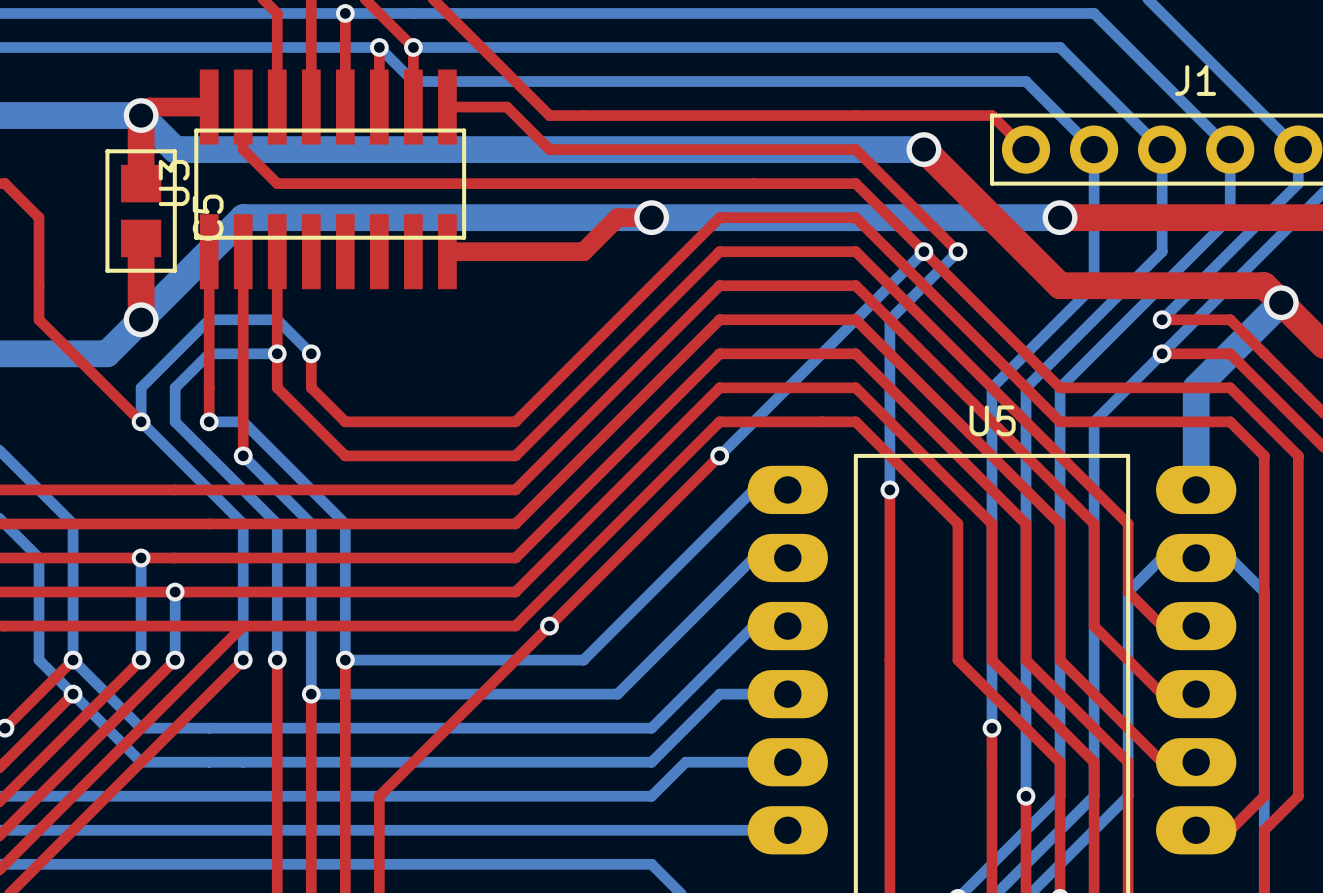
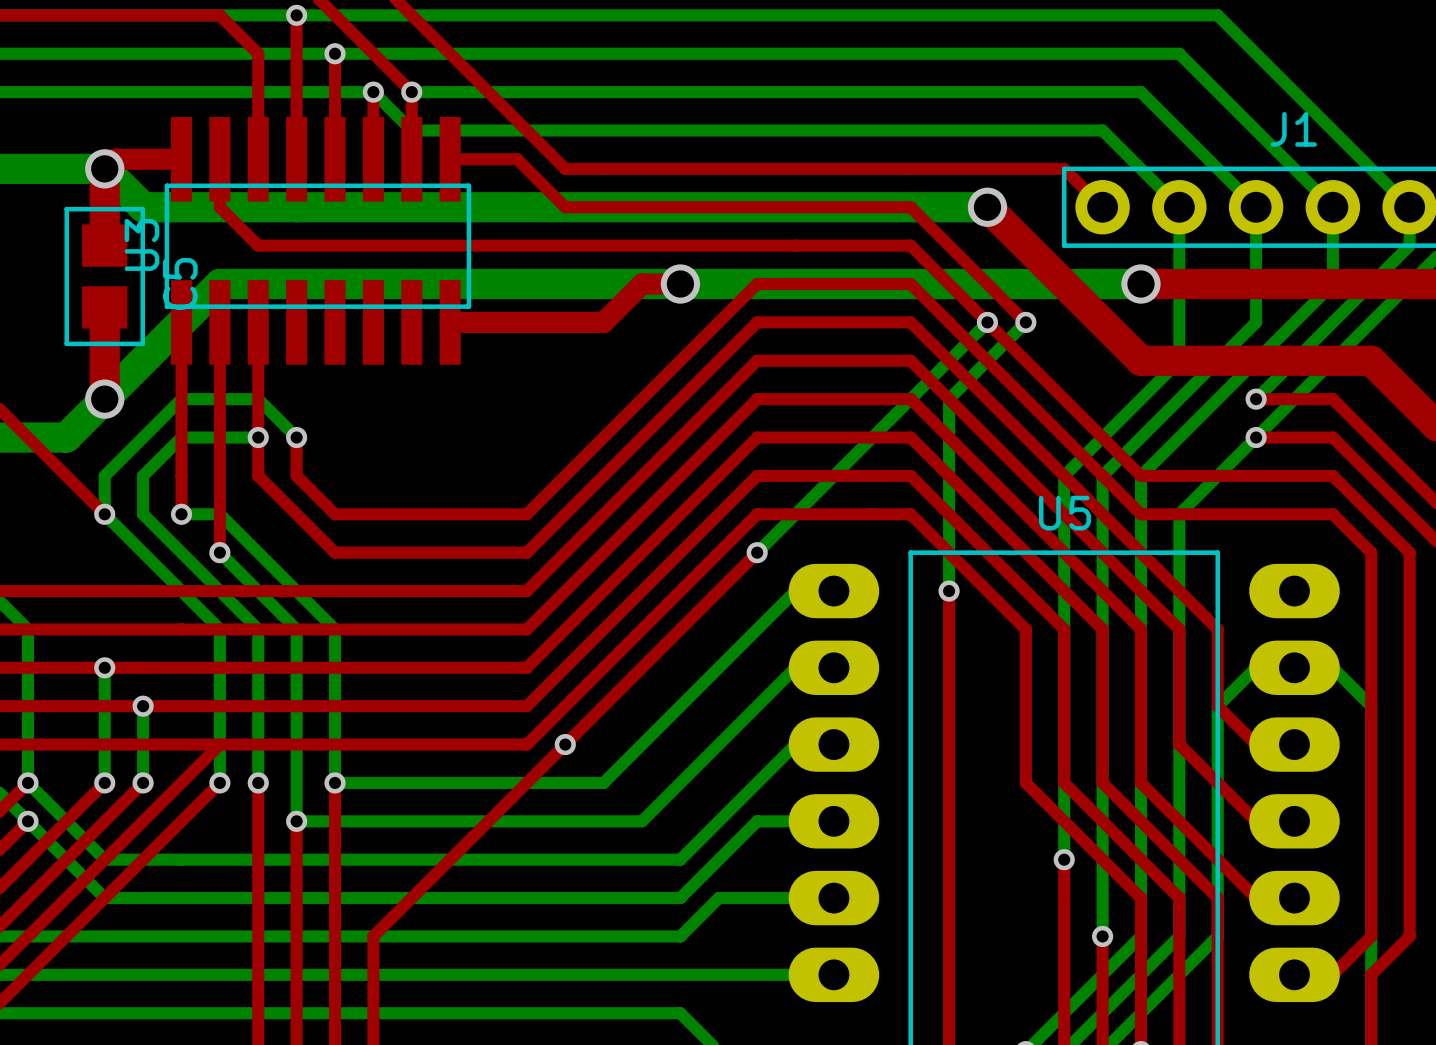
bottom track: (1281, 302) (1196, 387) (1196, 489) -> none
via: (1281, 302) -> none

